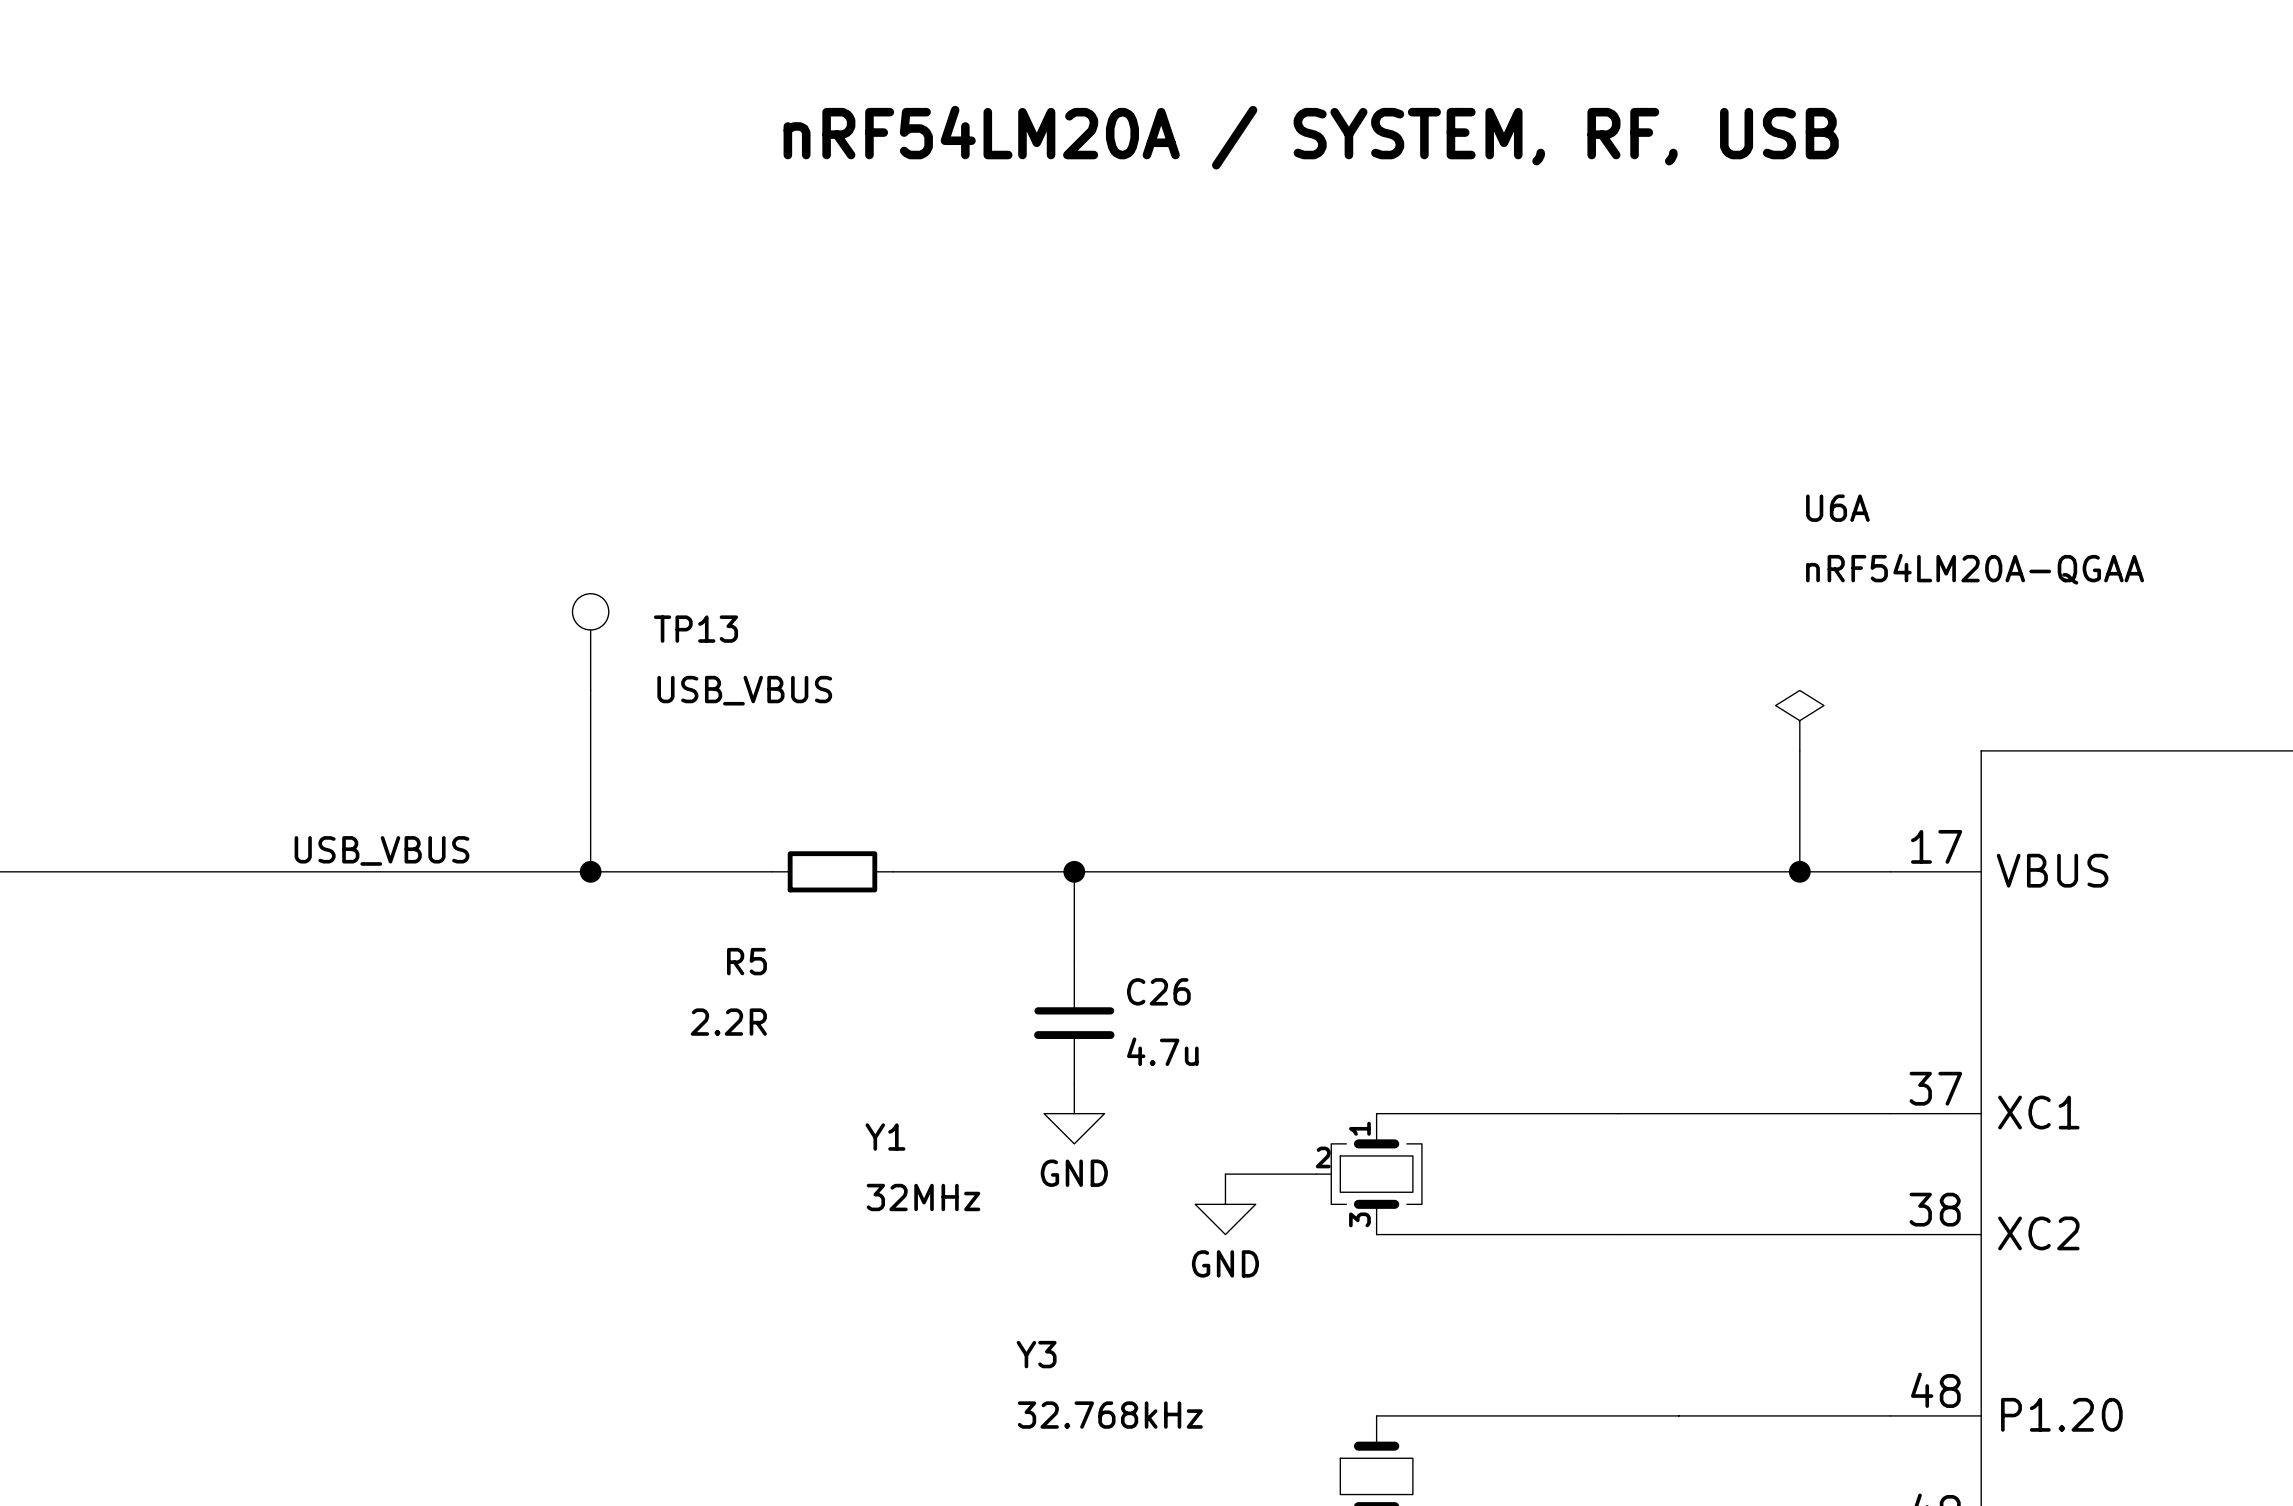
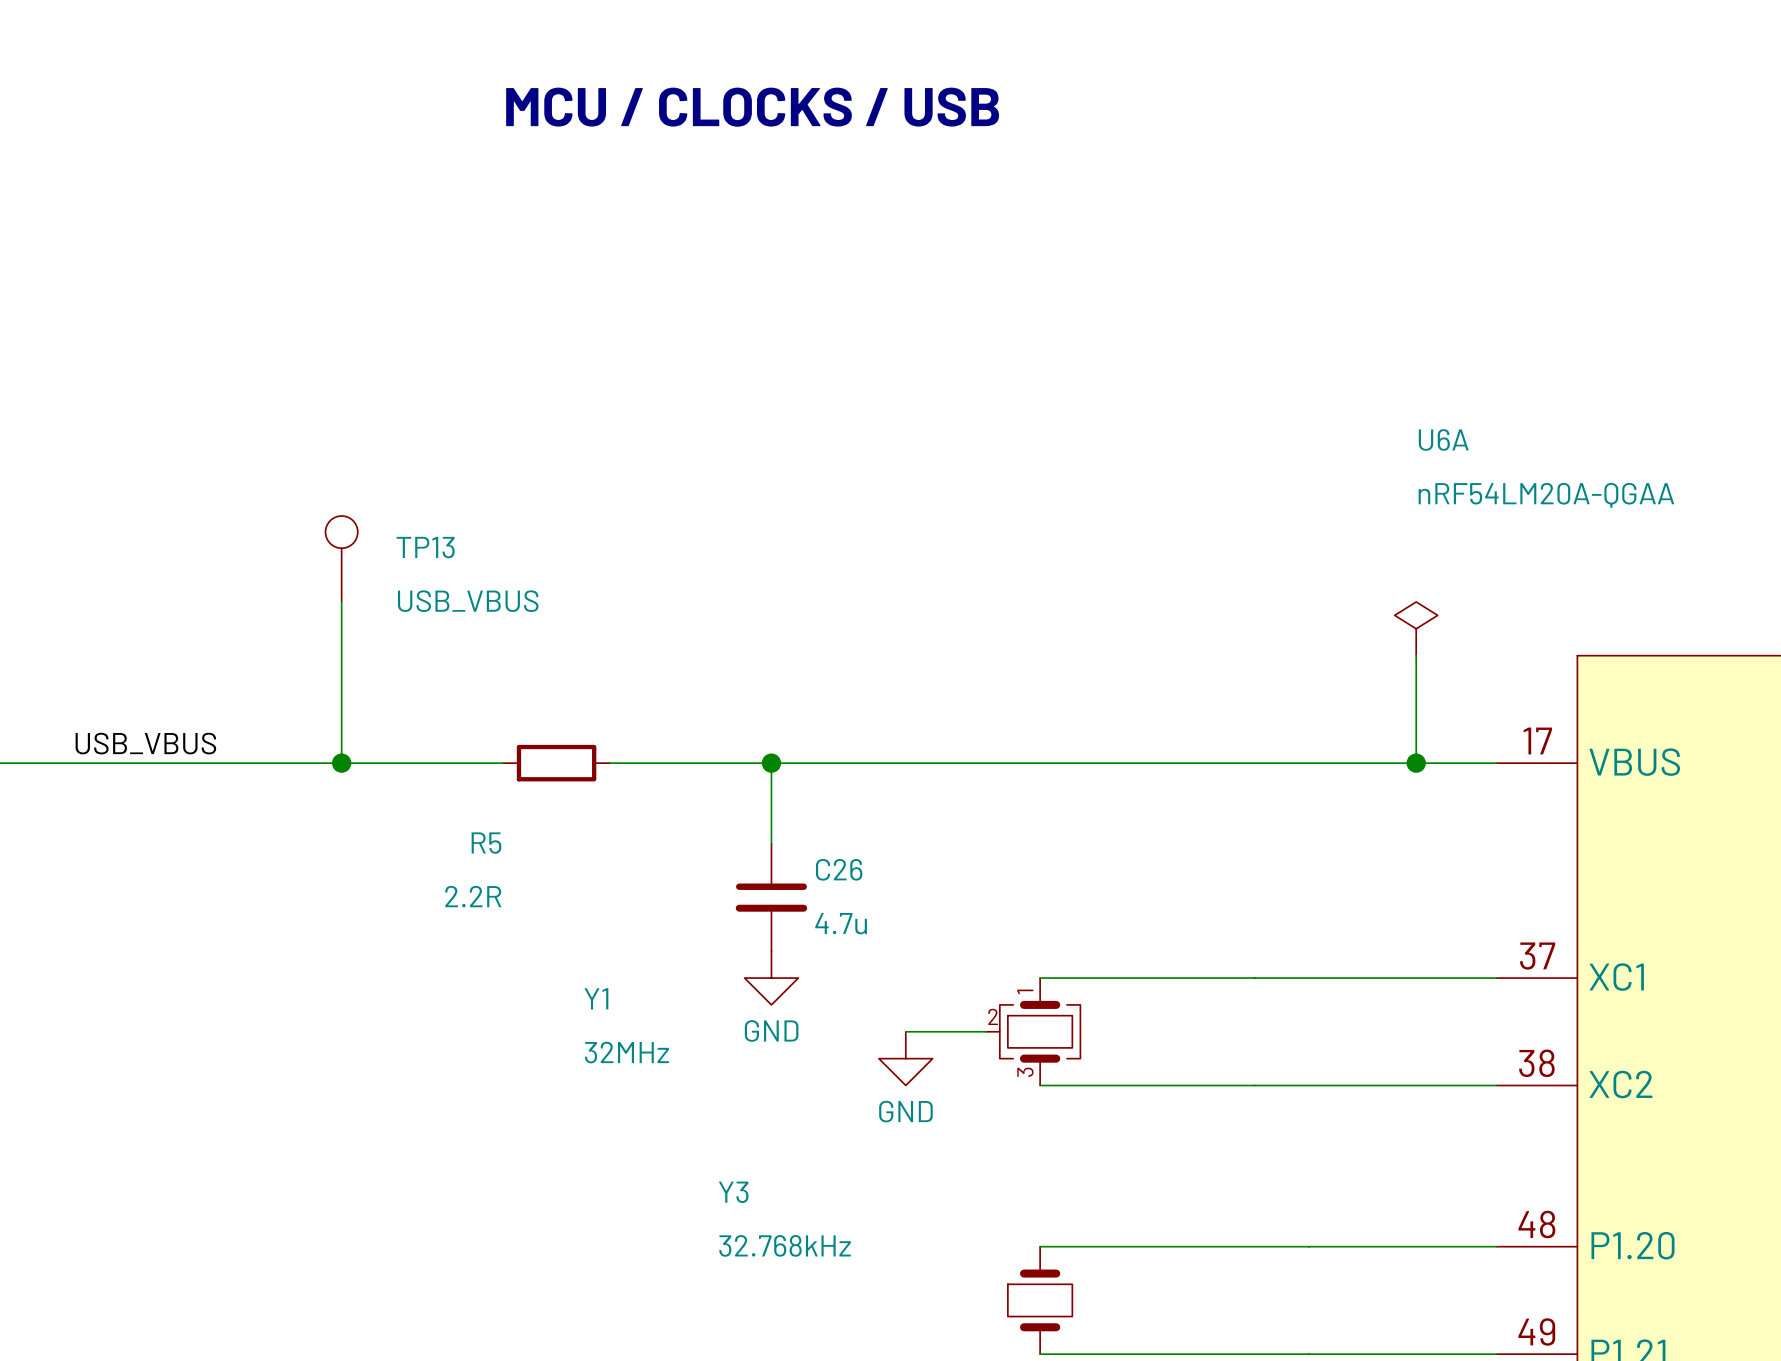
text: nRF54LM20A / SYSTEM, RF, USB (1311, 137) -> MCU / CLOCKS / USB (752, 107)

